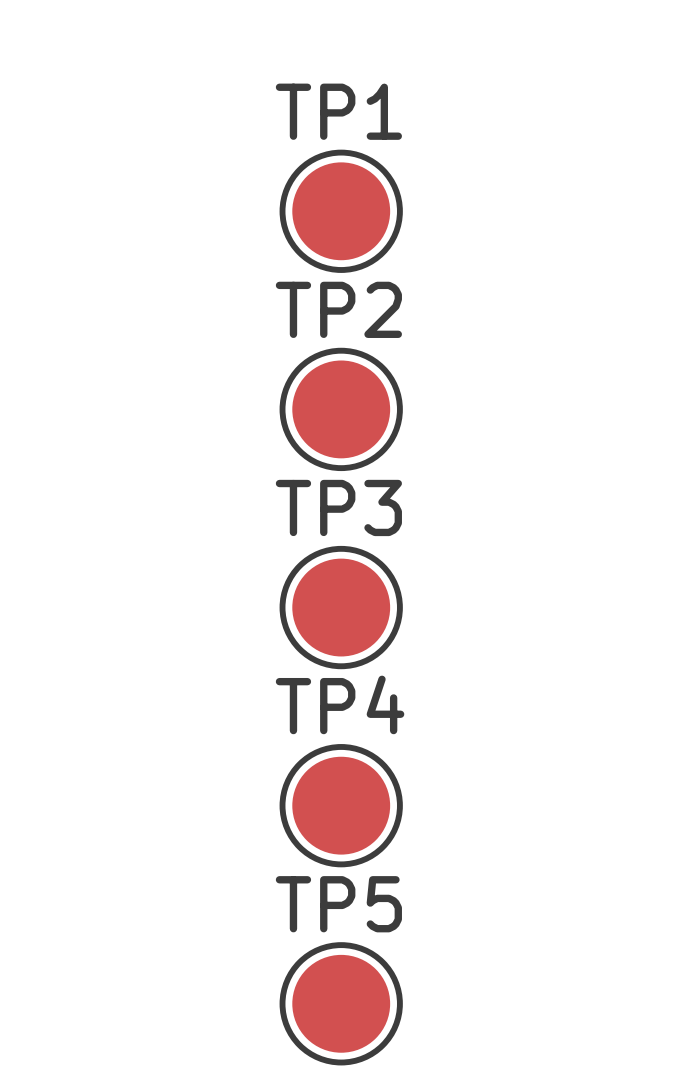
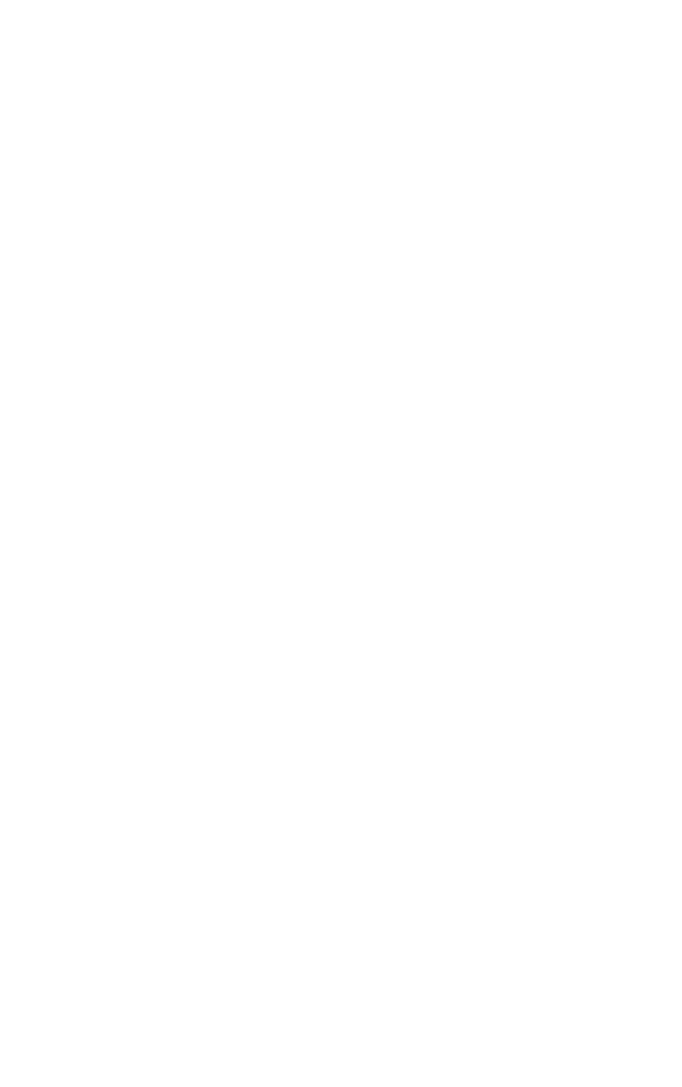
TP1: (341, 211) -> none
TP2: (341, 409) -> none
TP3: (341, 607) -> none
TP4: (341, 805) -> none
TP5: (341, 1003) -> none

